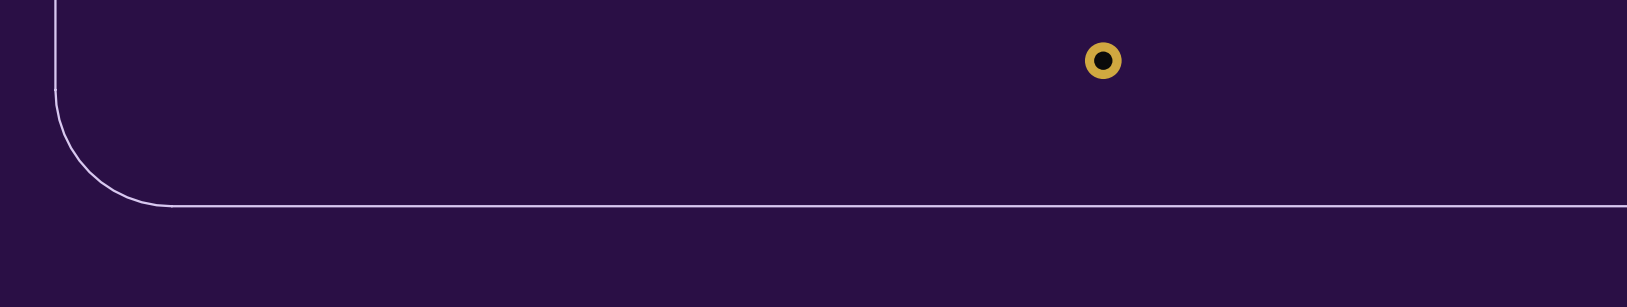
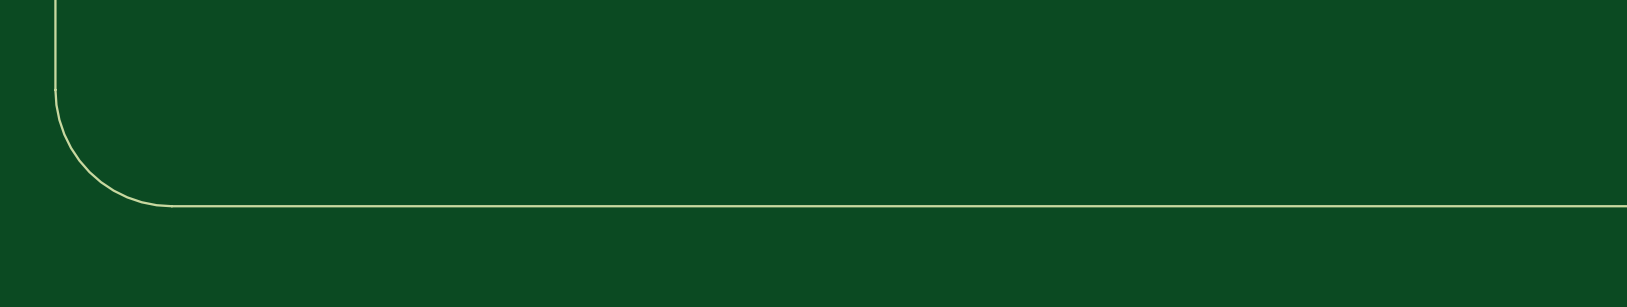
via: (1103, 60) -> none

